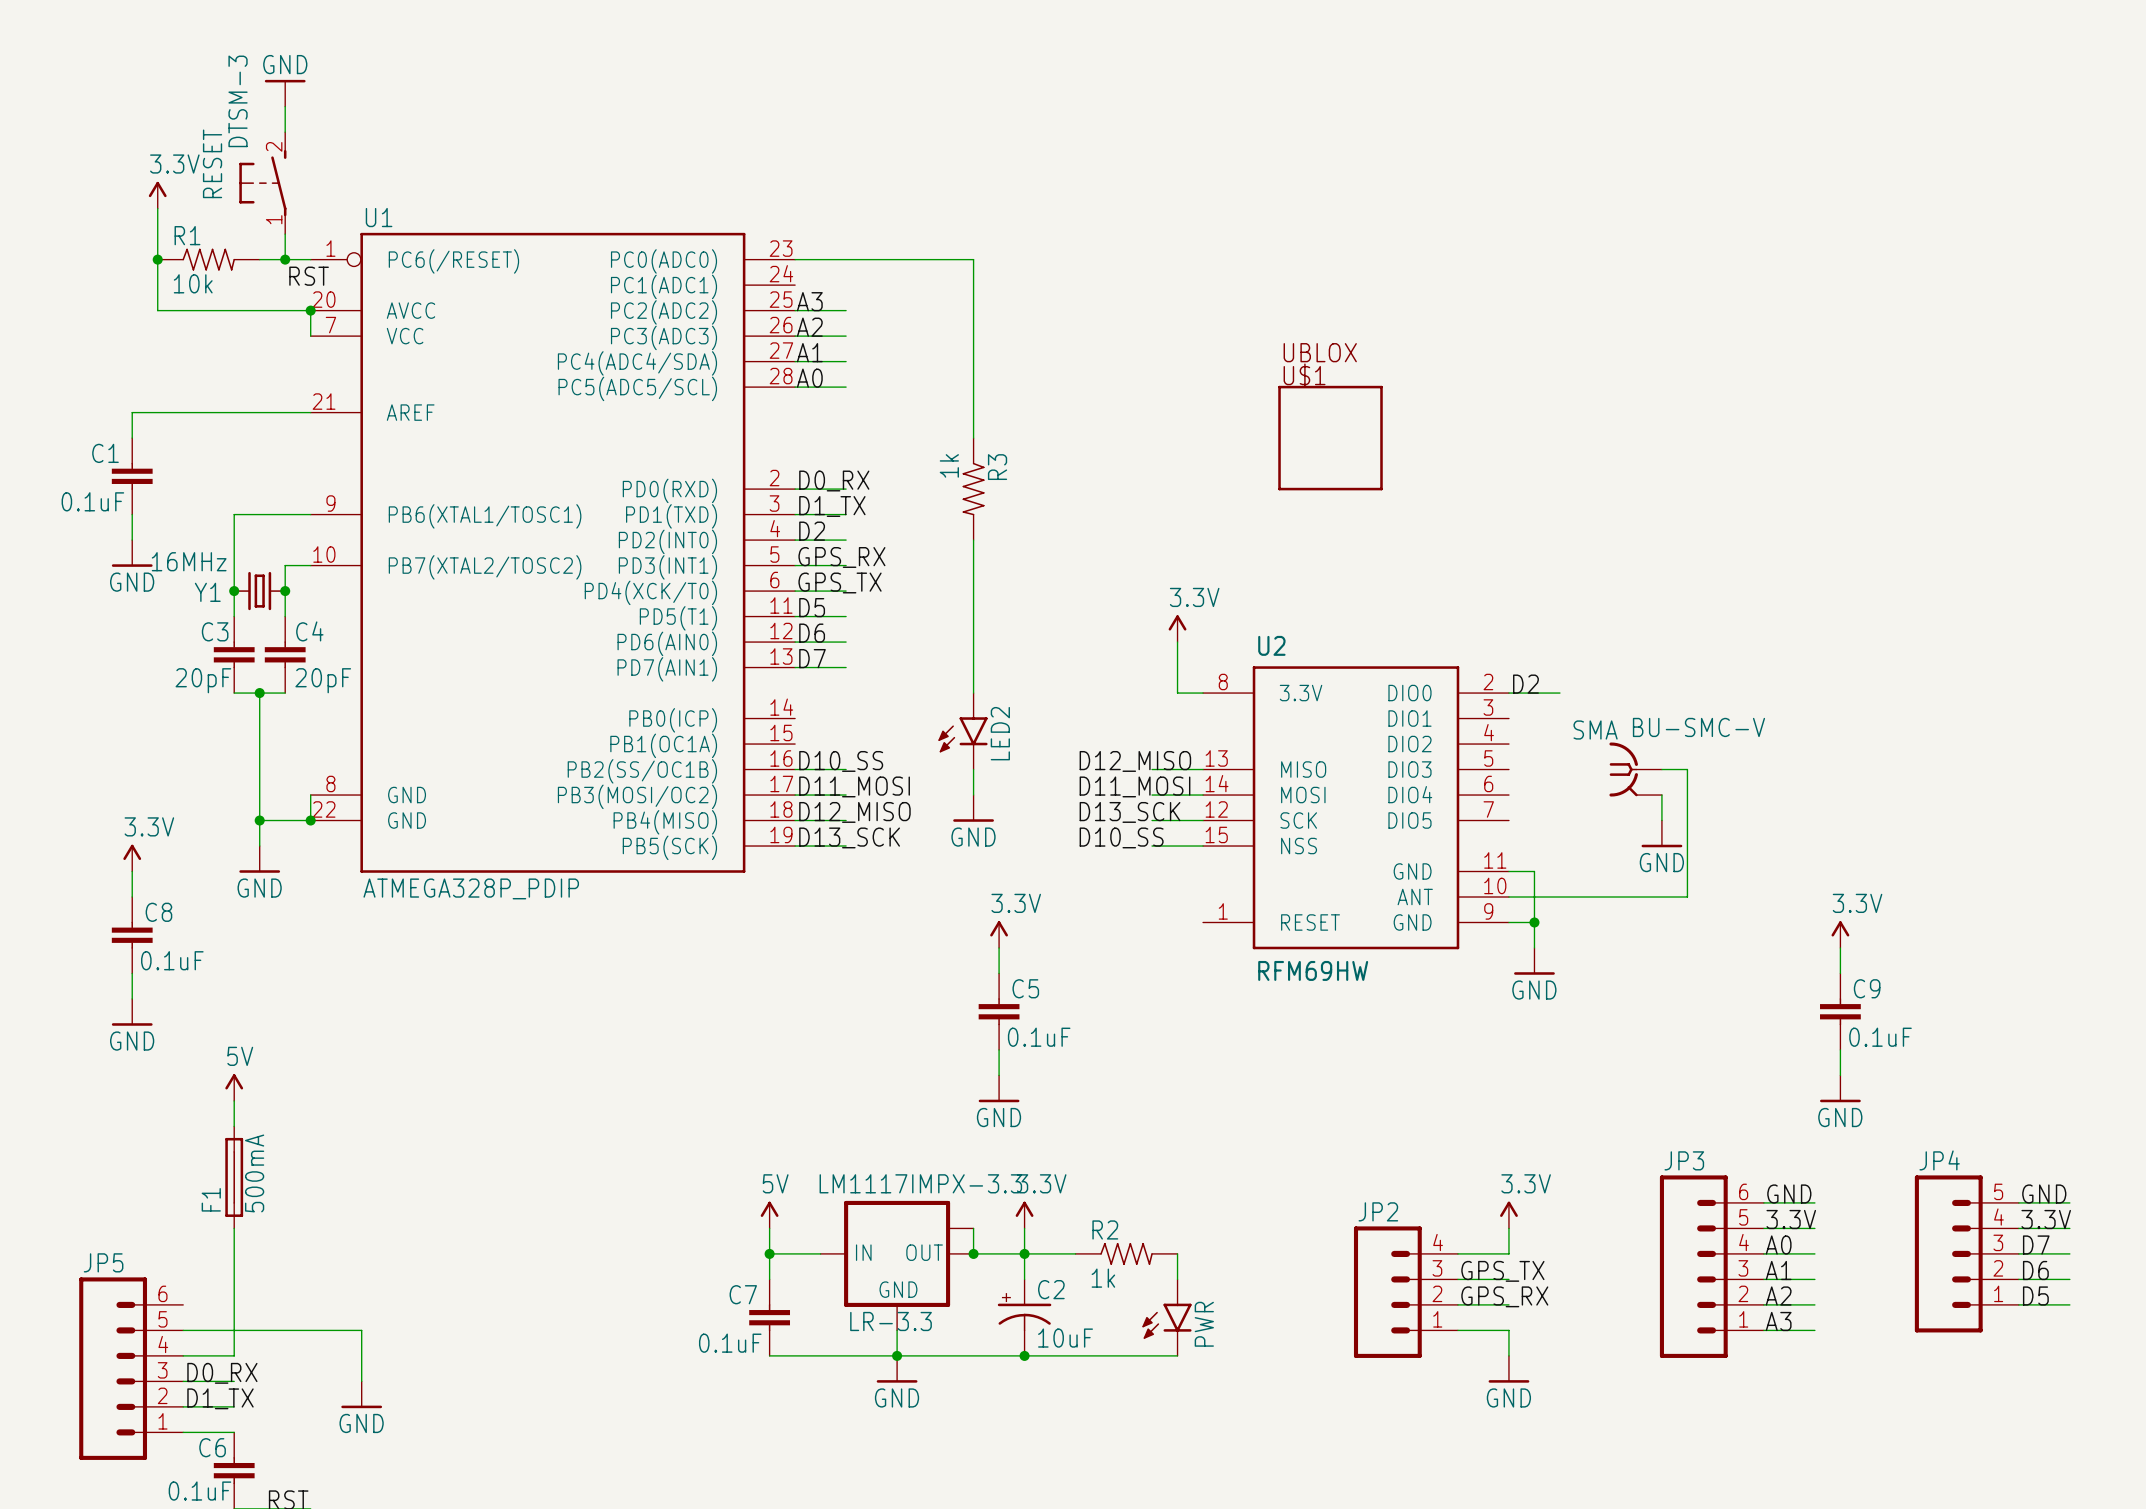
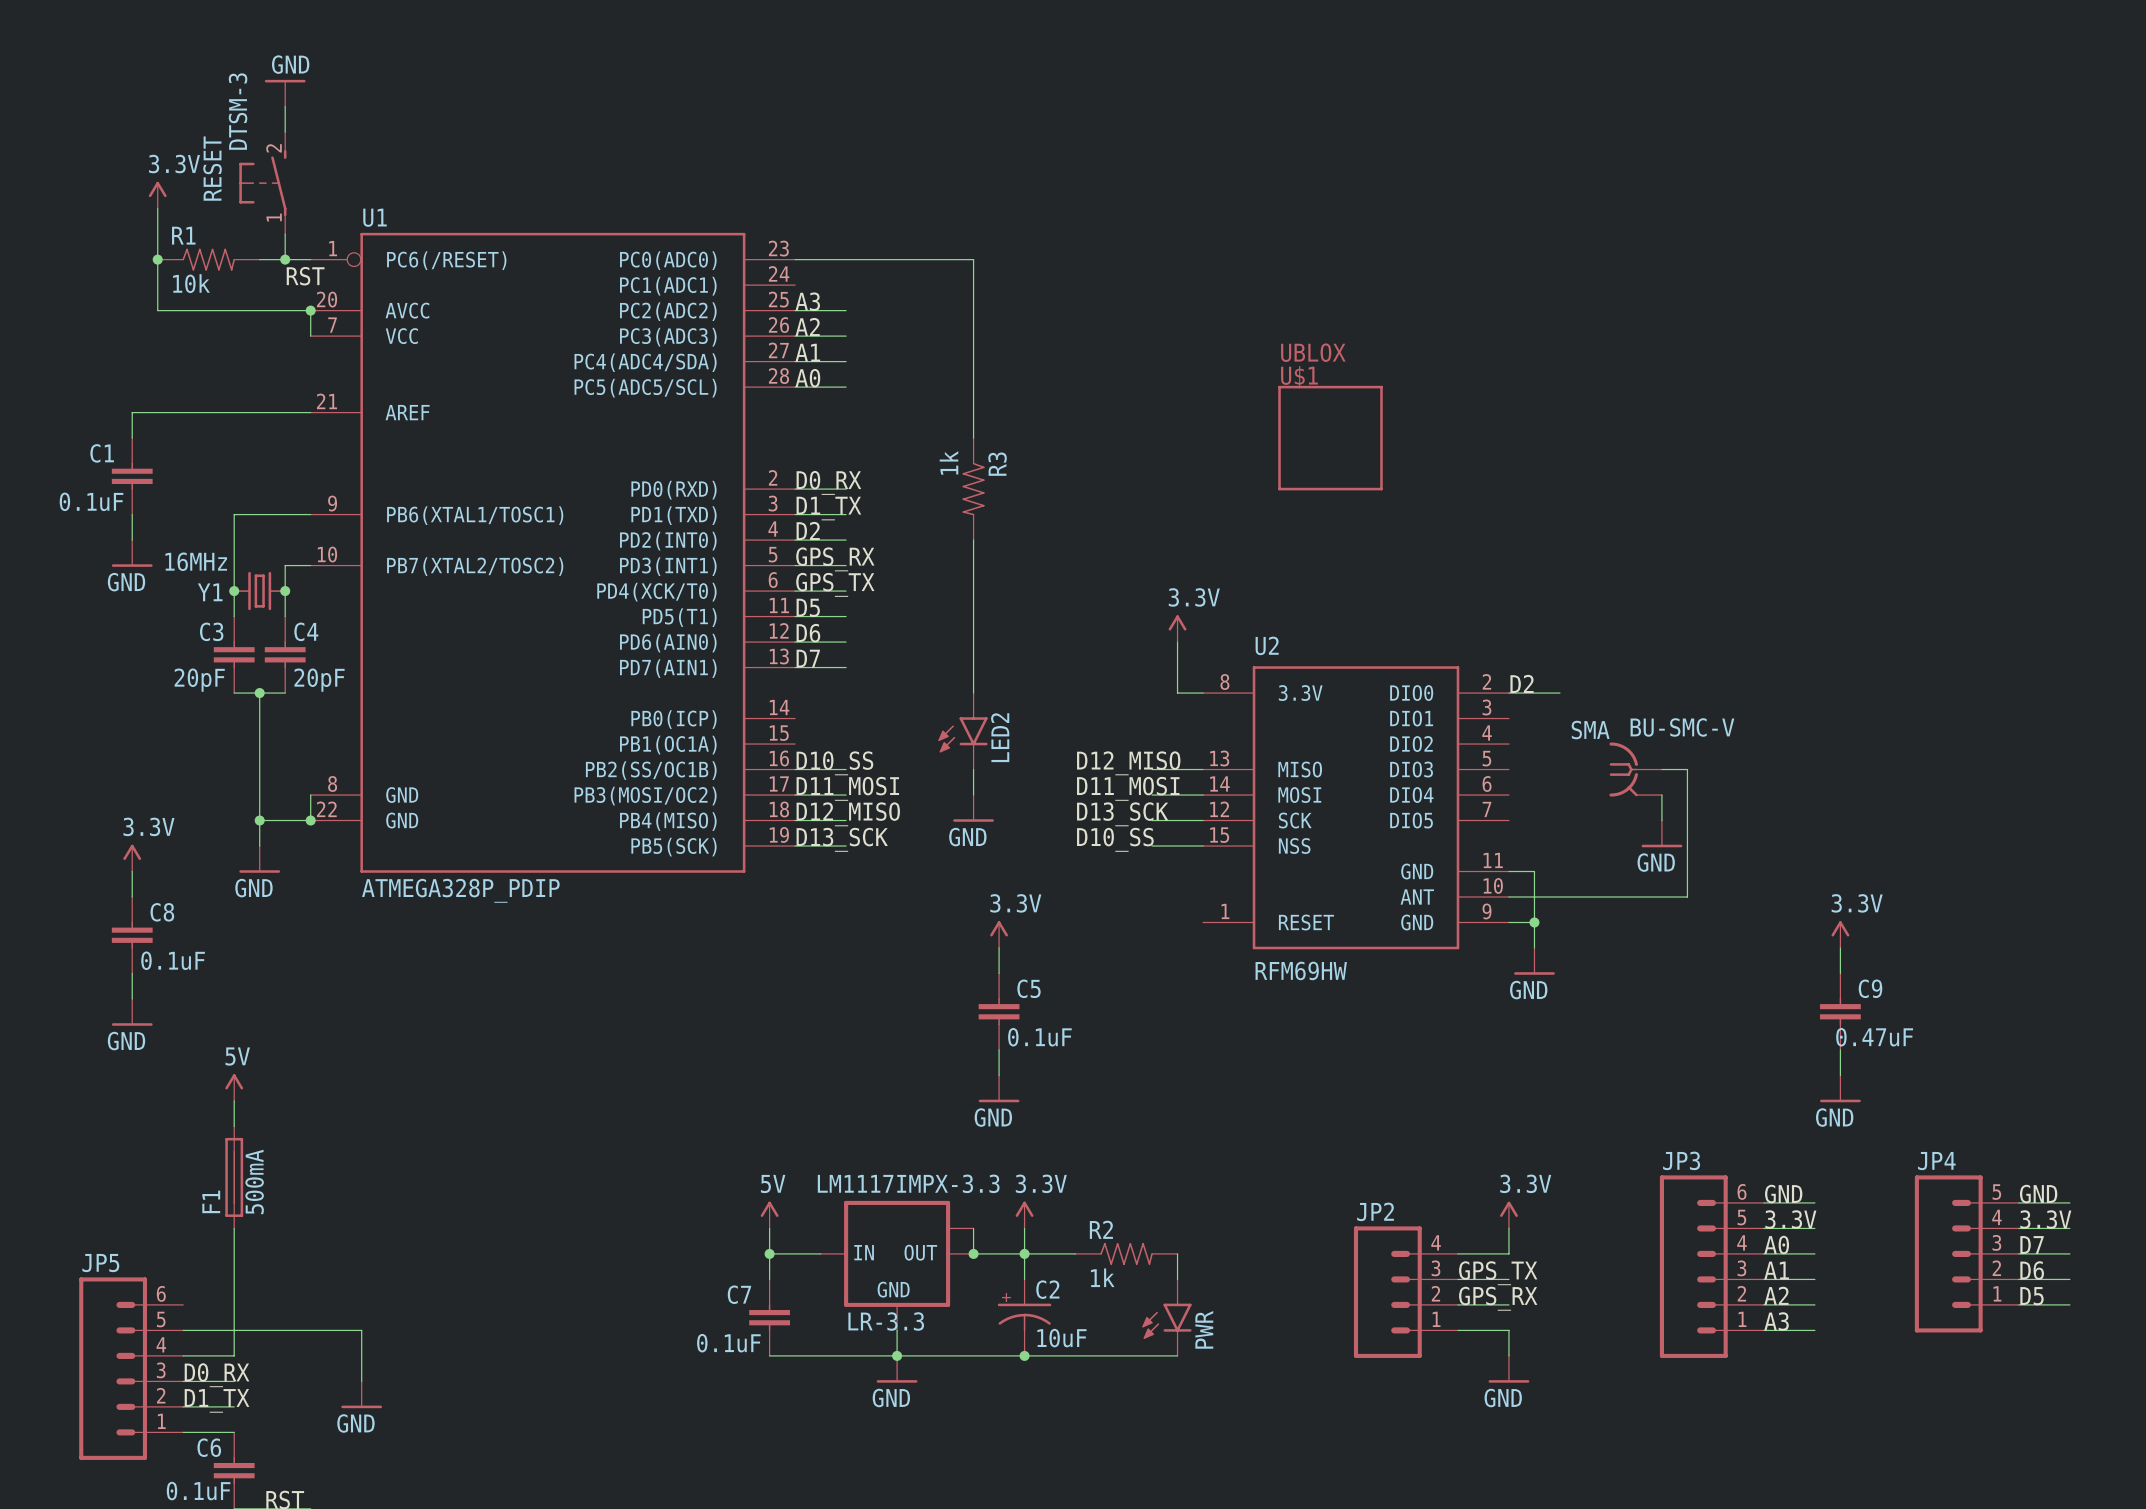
C9 value: 0.1uF (1880, 1037) -> 0.47uF (1874, 1037)

